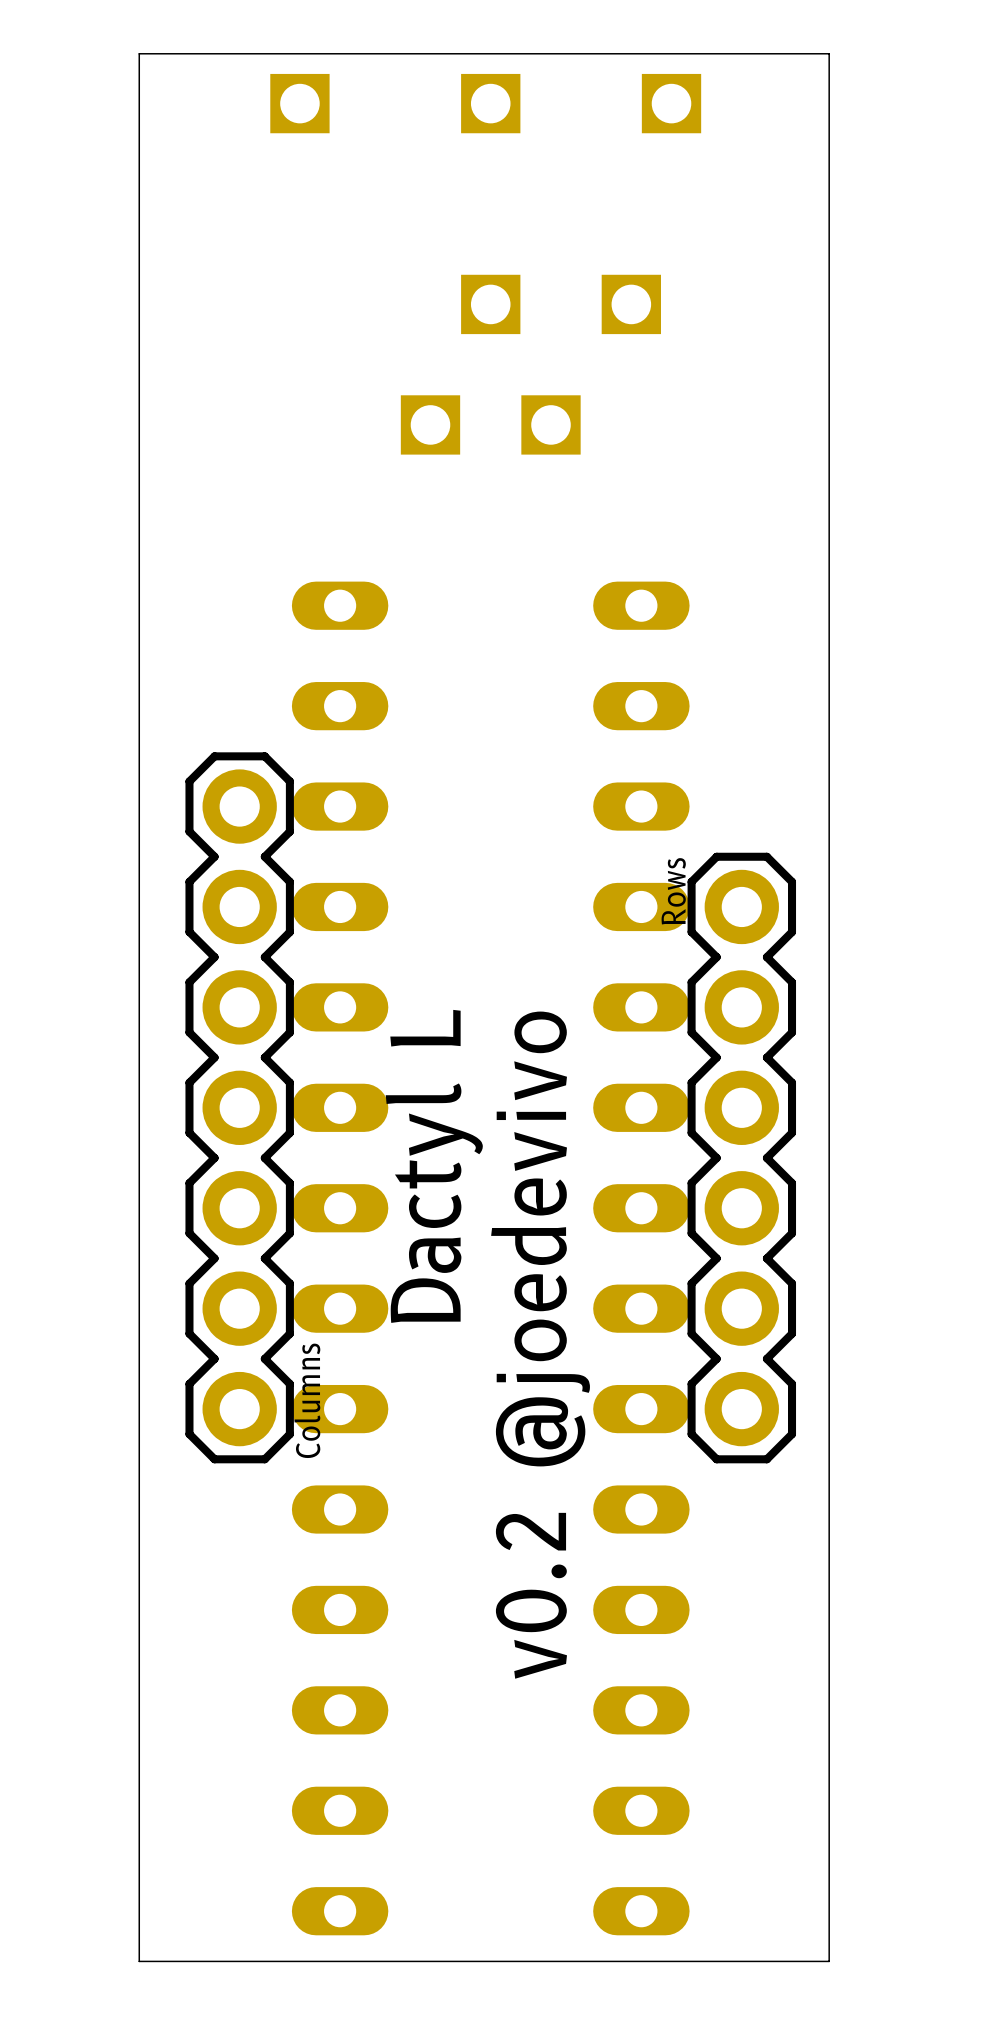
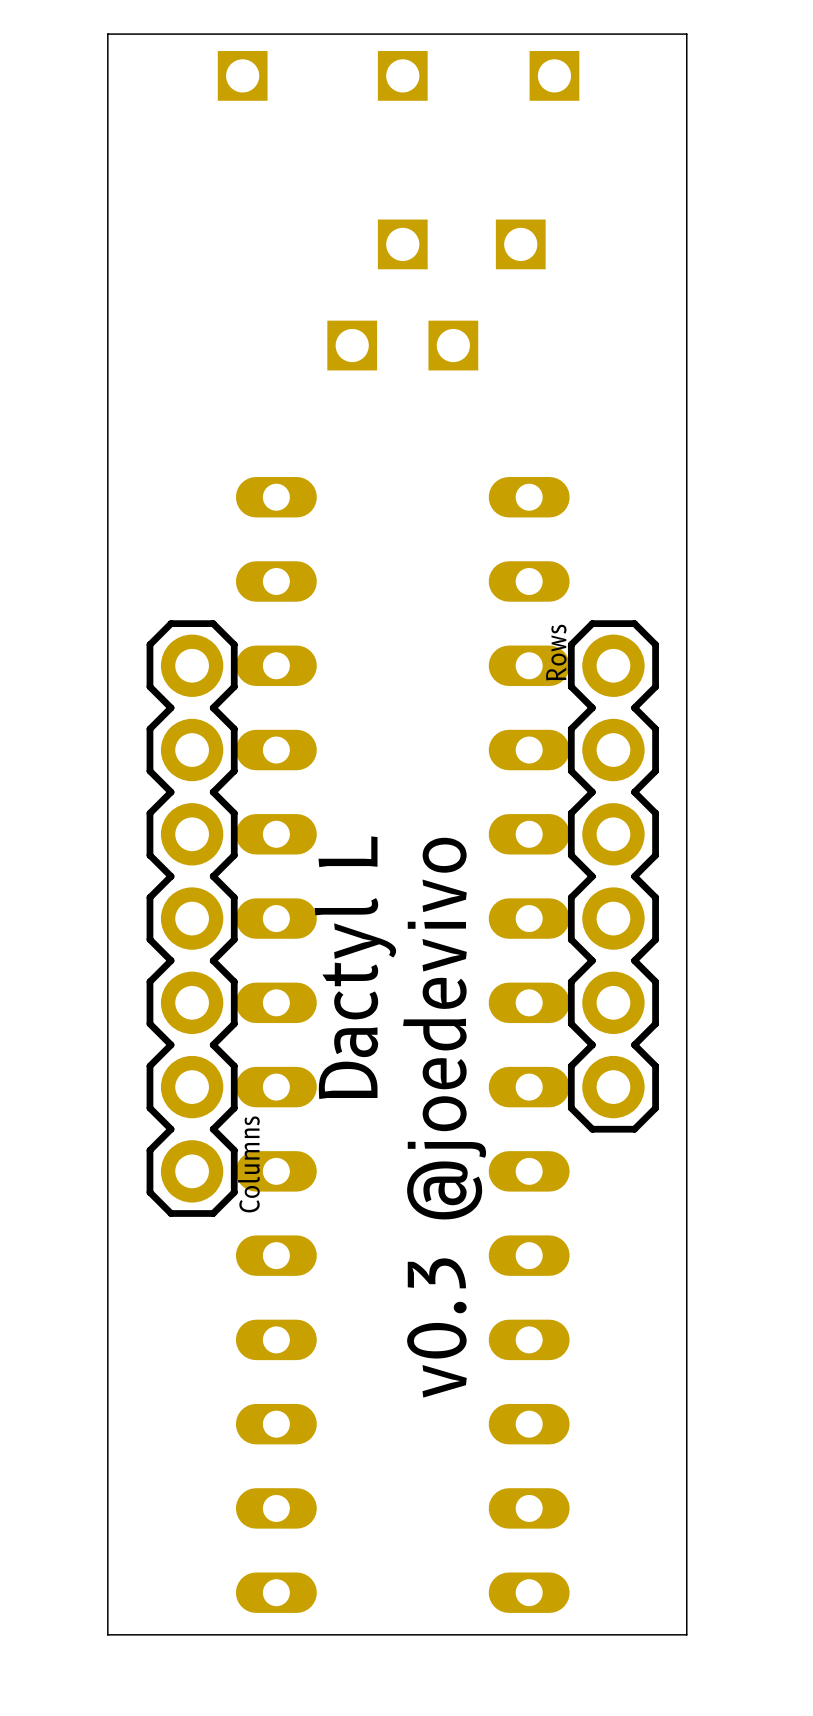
part position: (741, 1158) -> (613, 876)
text: v0.2 @joedevivo (540, 1345) -> v0.3 @joedevivo (444, 1117)

